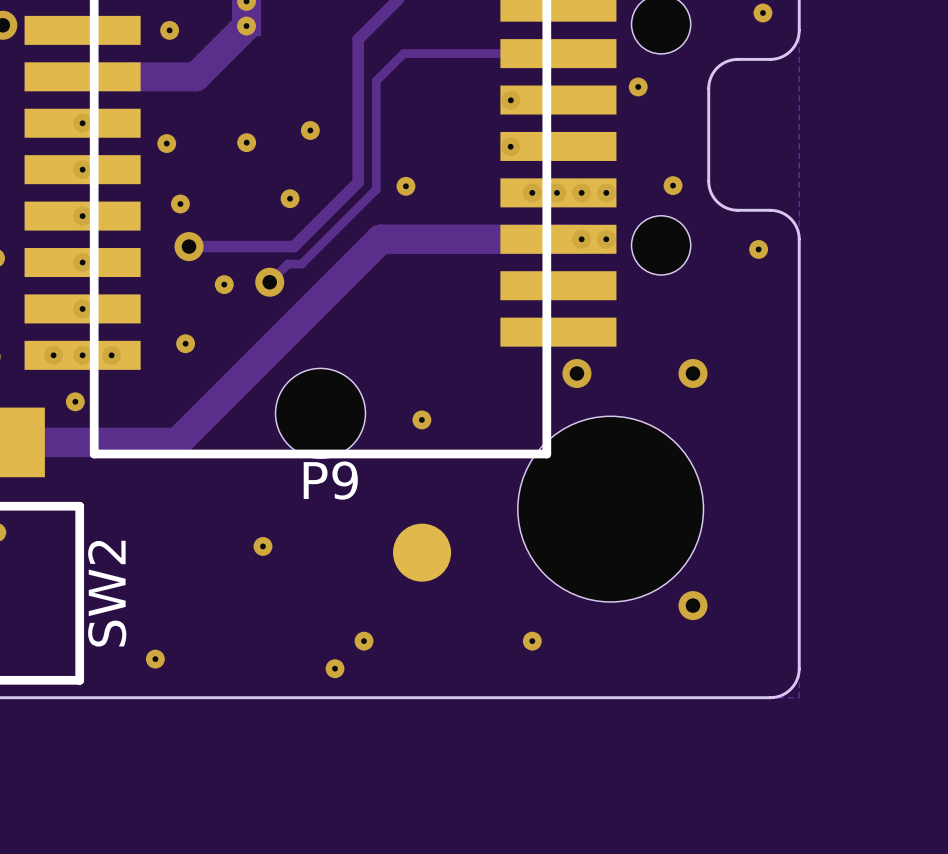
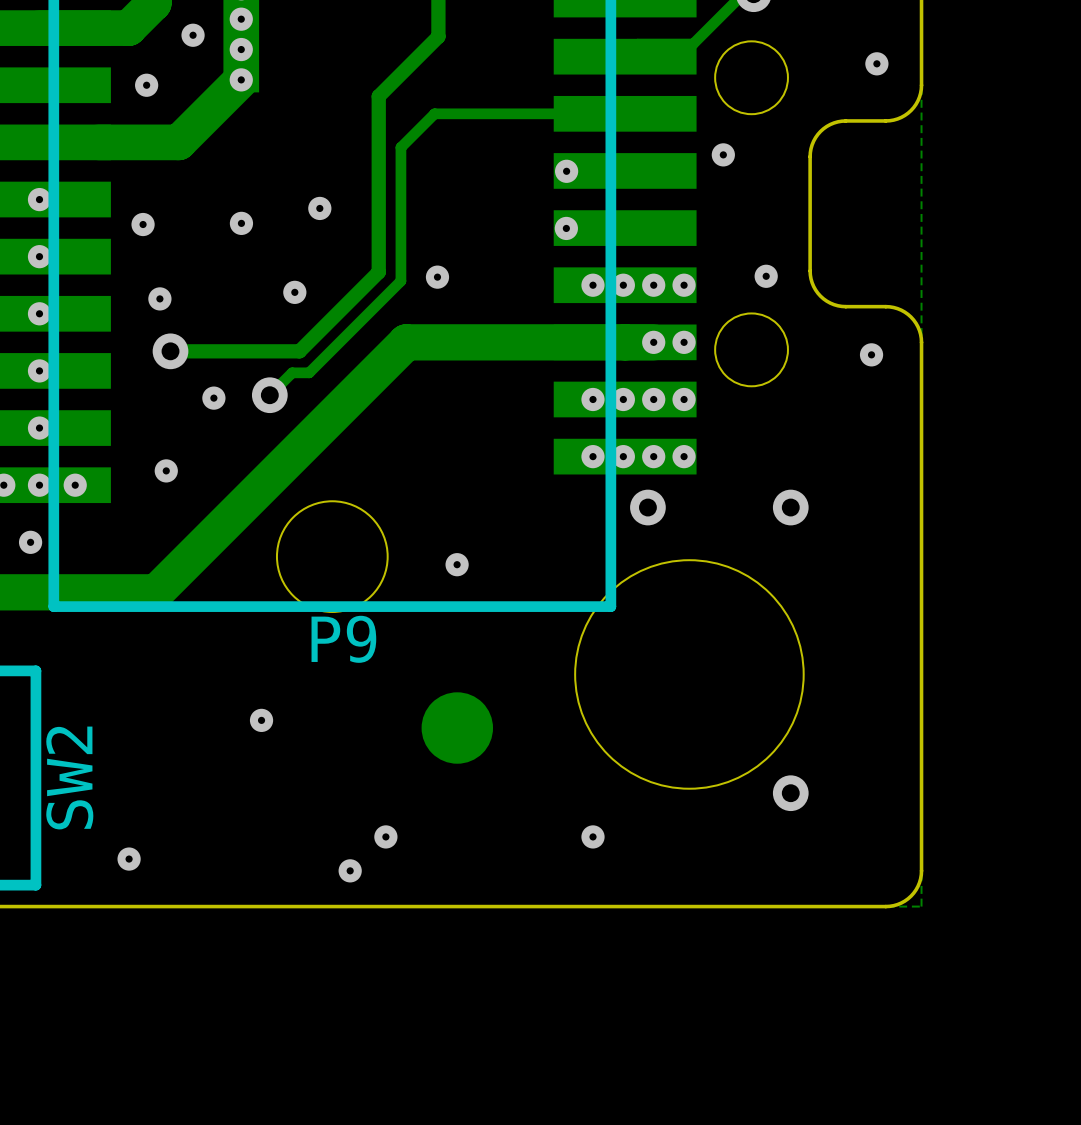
via: none -> (593, 399)
via: none -> (623, 399)
via: none -> (653, 399)
via: none -> (684, 399)
via: none -> (593, 456)
via: none -> (623, 456)
via: none -> (653, 456)
via: none -> (684, 456)

